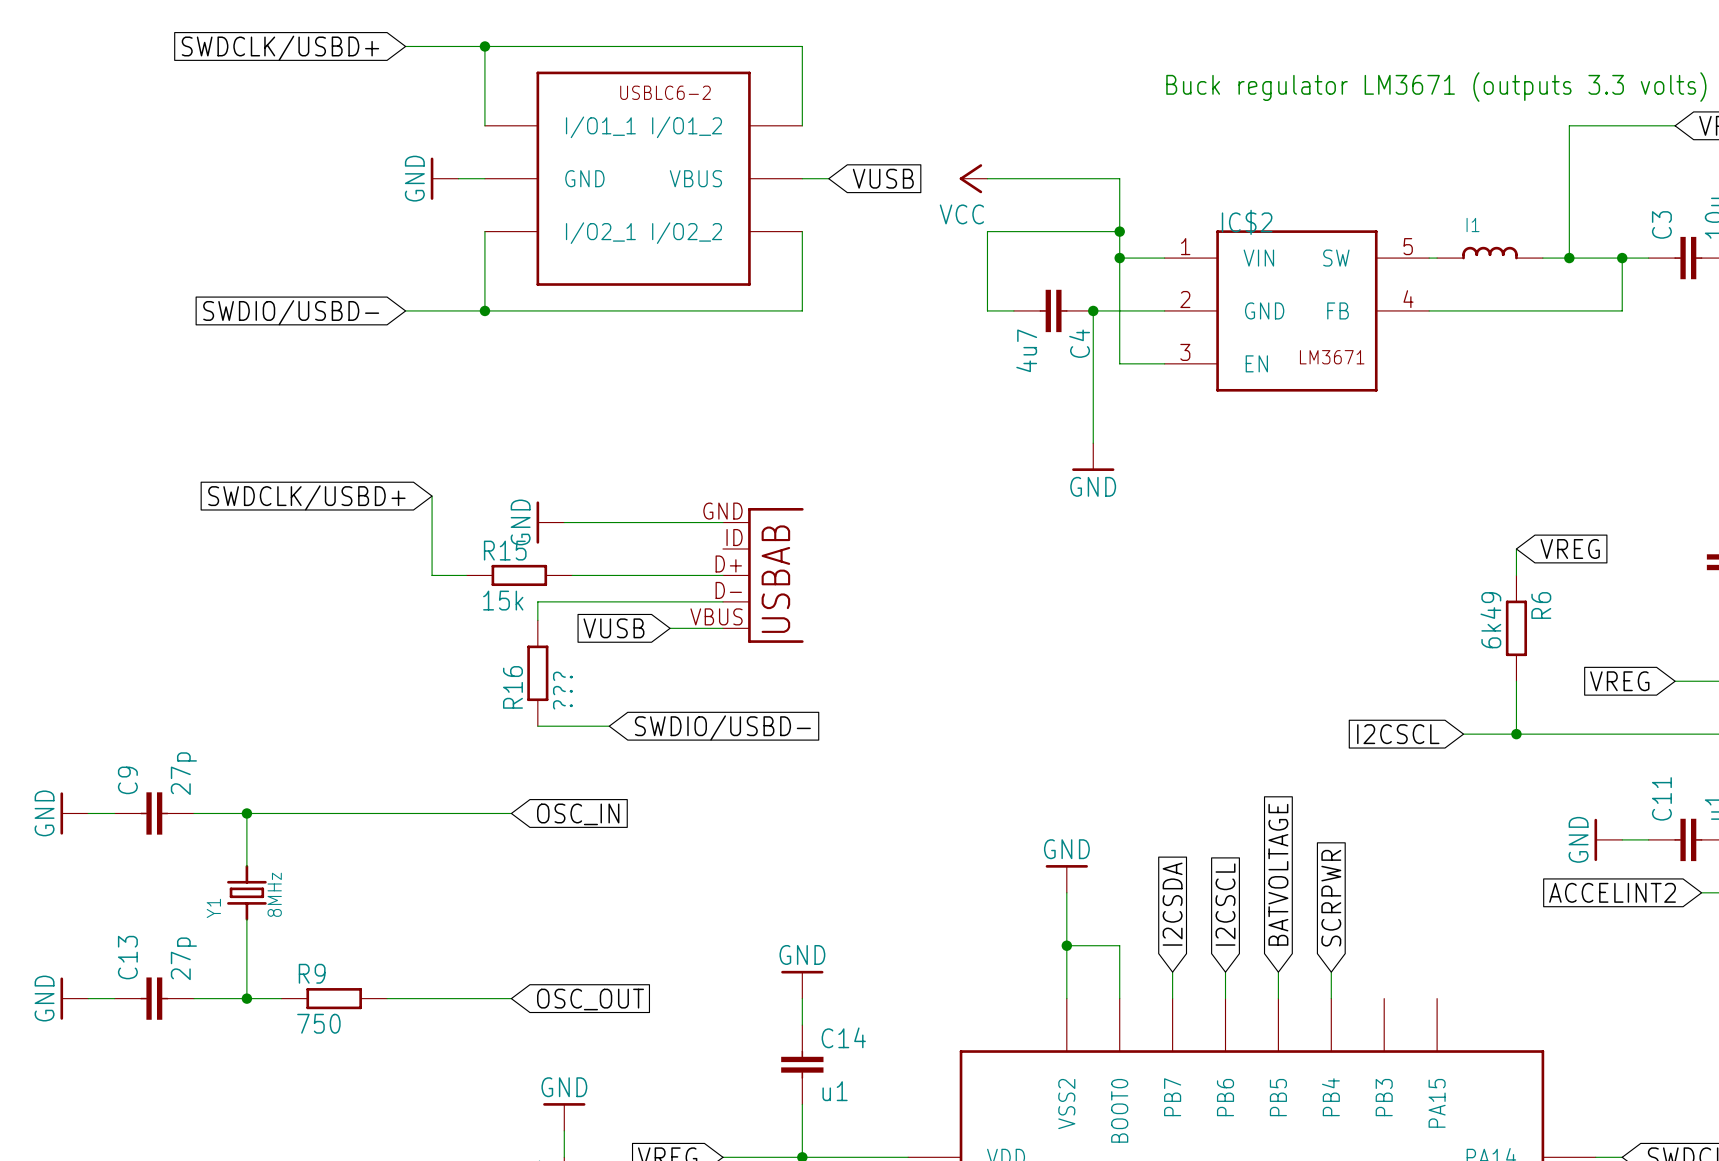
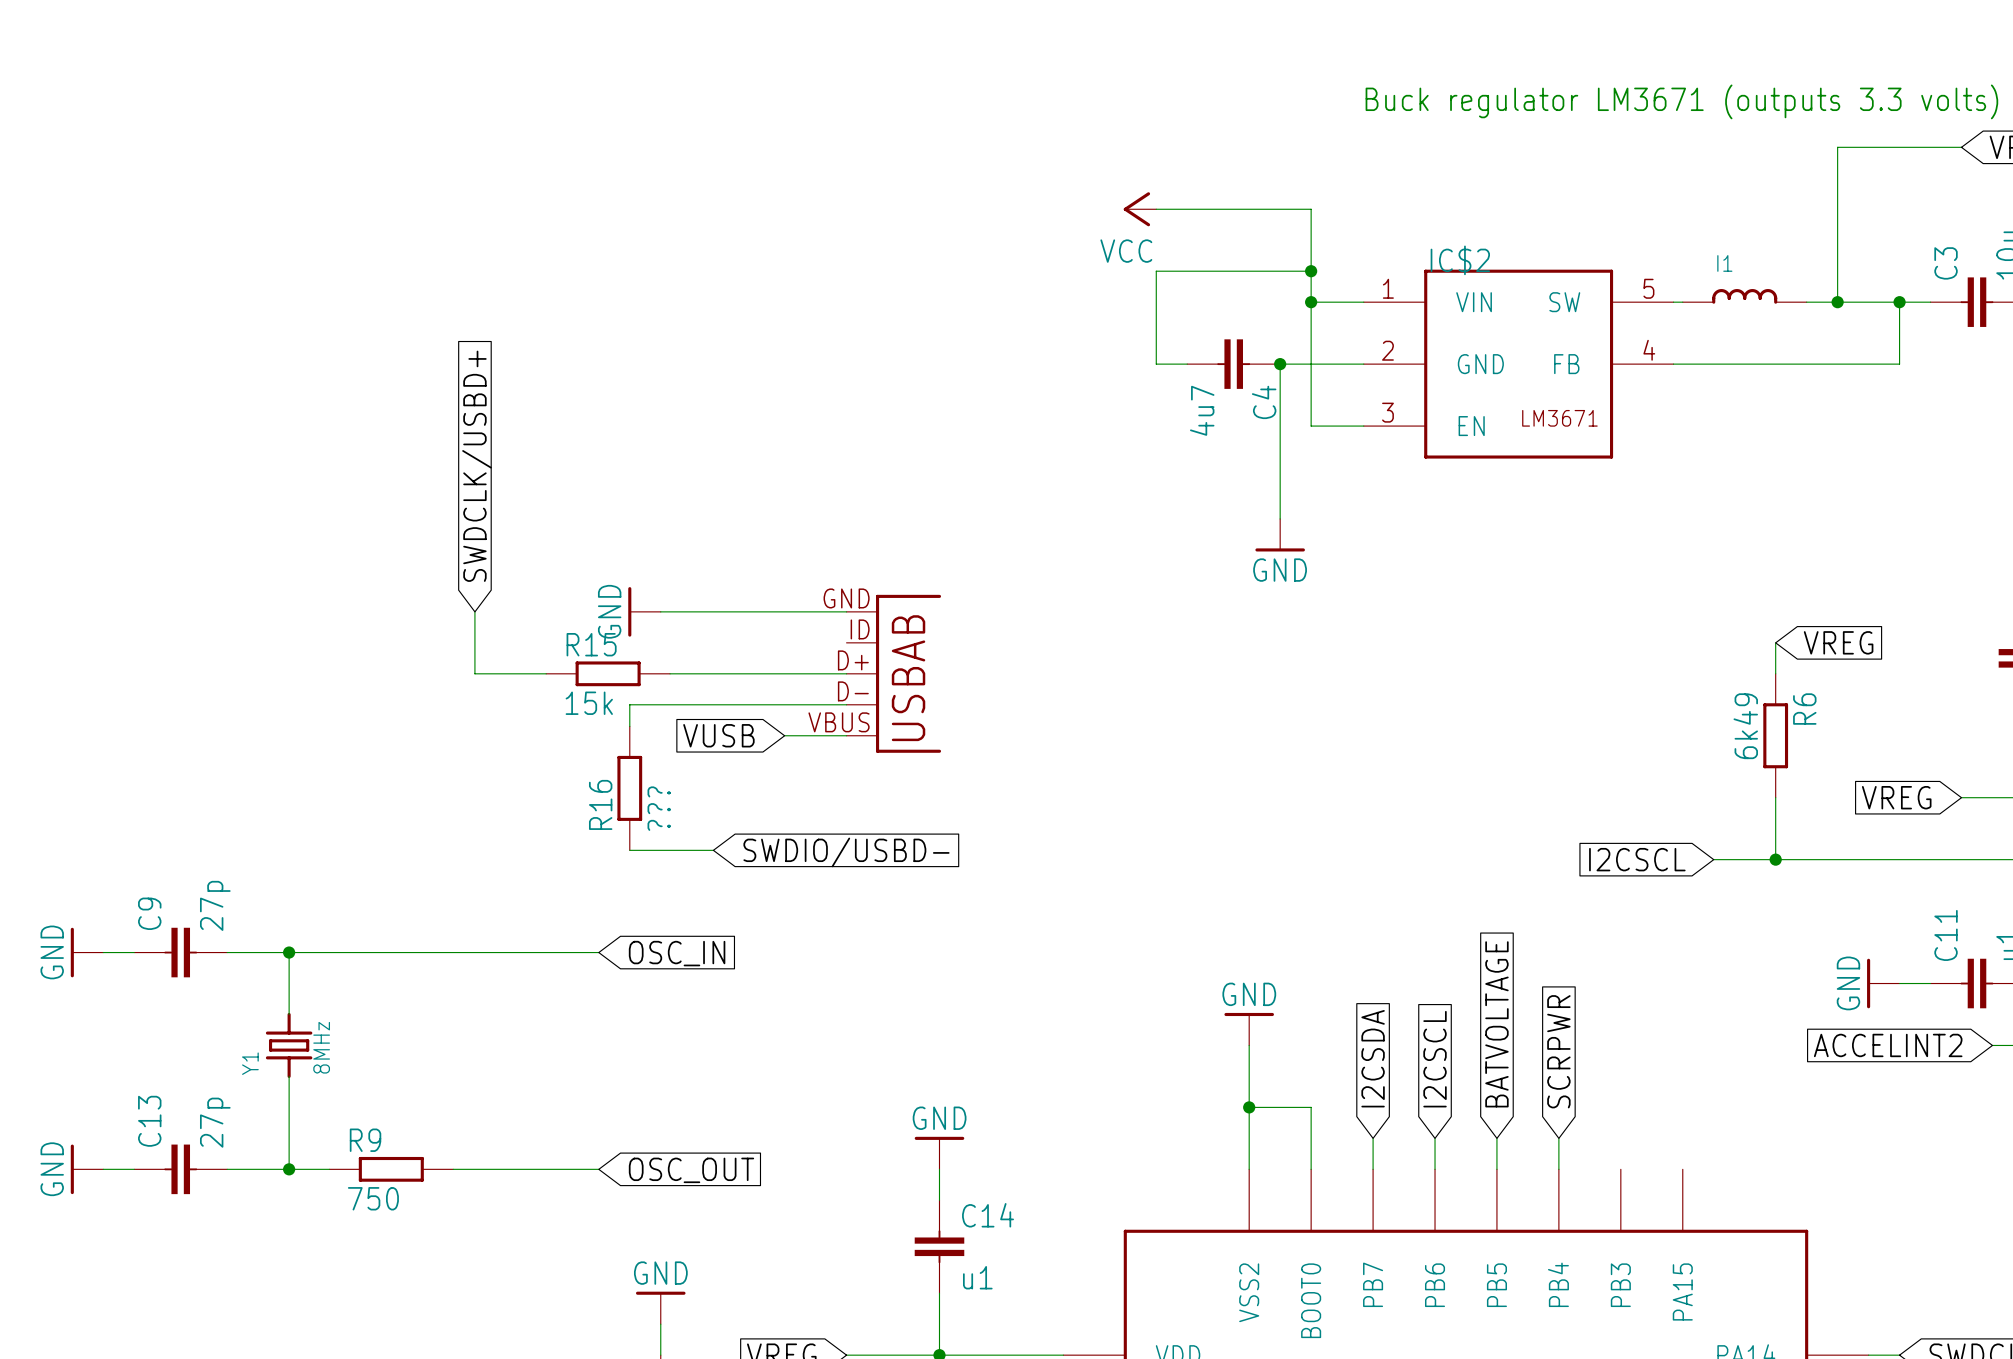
wire: (405, 46) (802, 46) (802, 125) -> none
wire: (484, 46) (484, 125) -> none
junction: (484, 46) -> none
global label: SWDCLK/USBD+ (280, 48) -> none
power symbol: GND (444, 178) -> none
wire: (458, 178) (484, 178) -> none
part: (643, 178) -> none
wire: (802, 178) (828, 178) -> none
global label: VUSB (883, 178) -> none
wire: (484, 231) (484, 310) -> none
wire: (802, 231) (802, 310) (405, 310) -> none
junction: (484, 310) -> none
global label: SWDIO/USBD- (291, 312) -> none
wire: (432, 496) (432, 575) -> (474, 611) (474, 673) (505, 673)
global label rotation: 0° (306, 497) -> 90° clockwise (477, 466)

